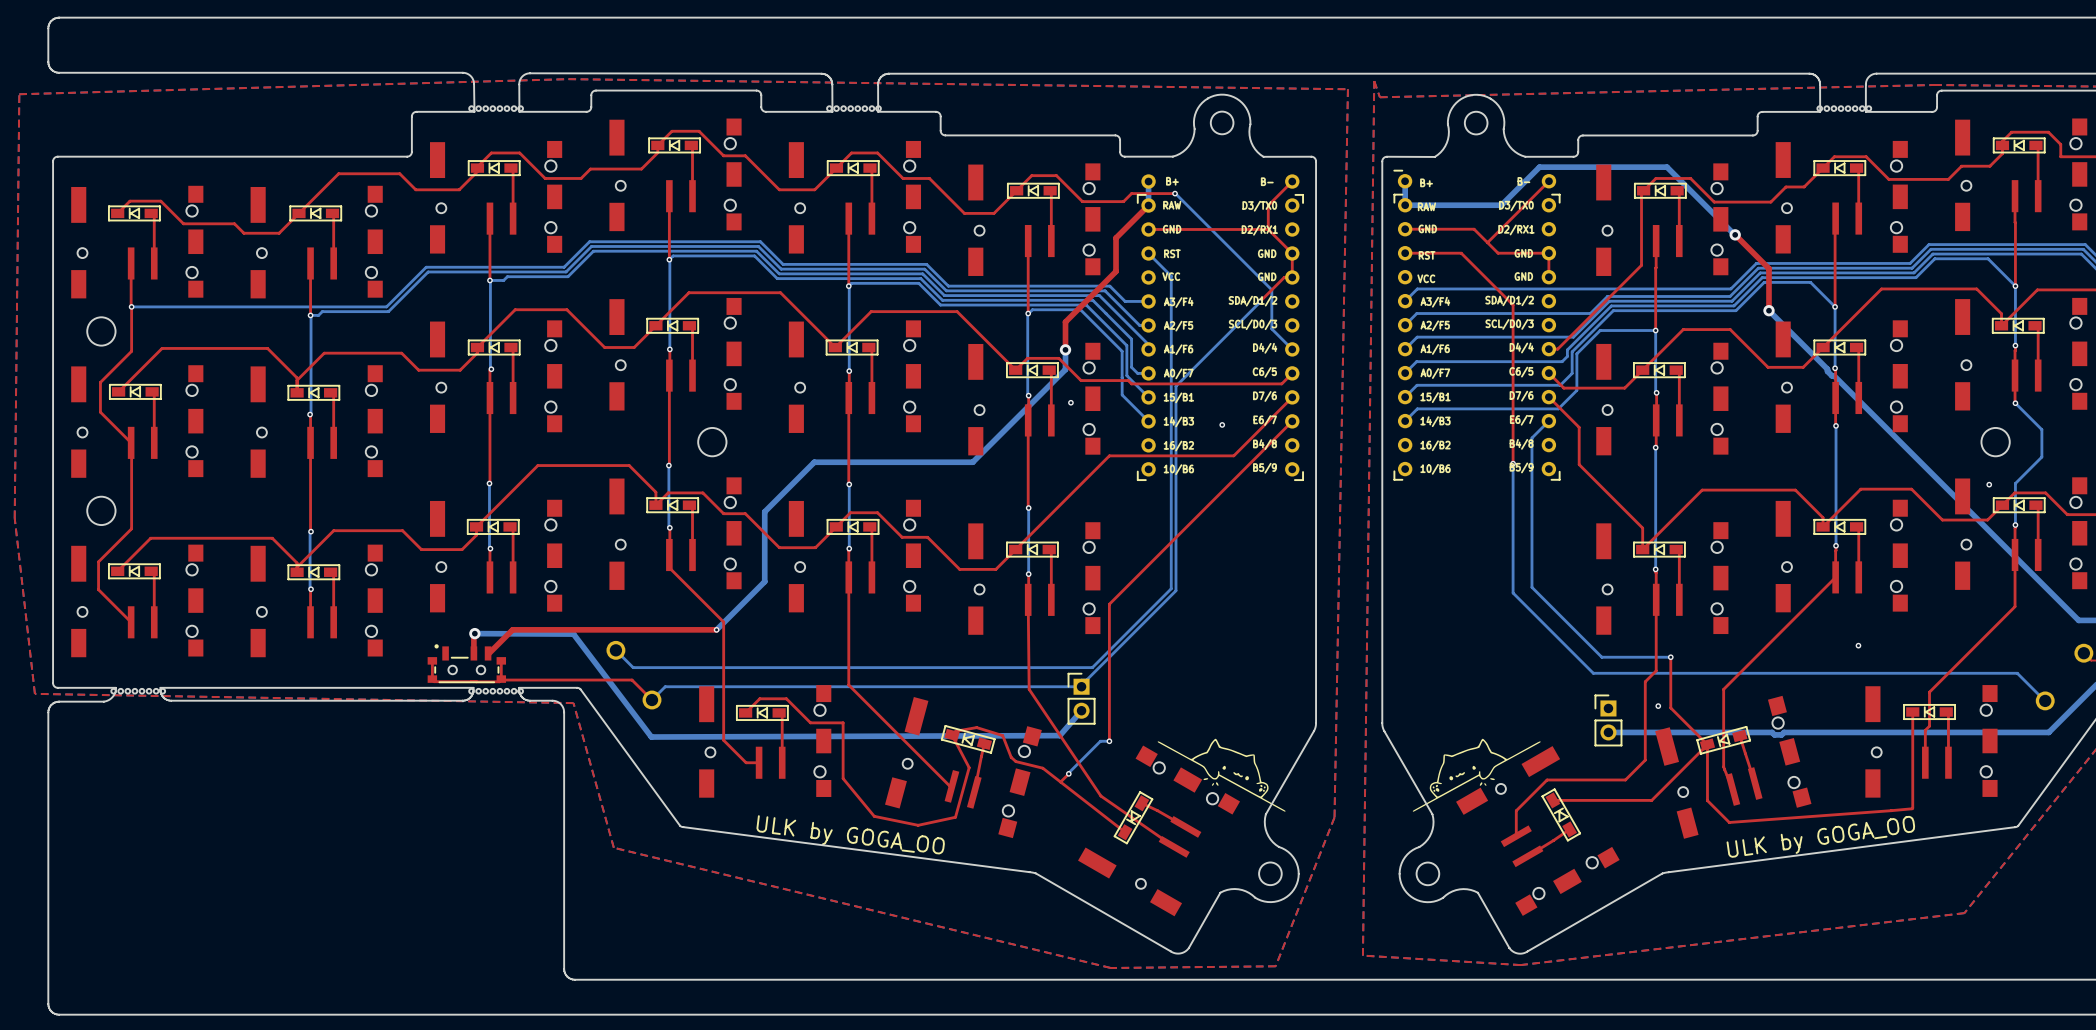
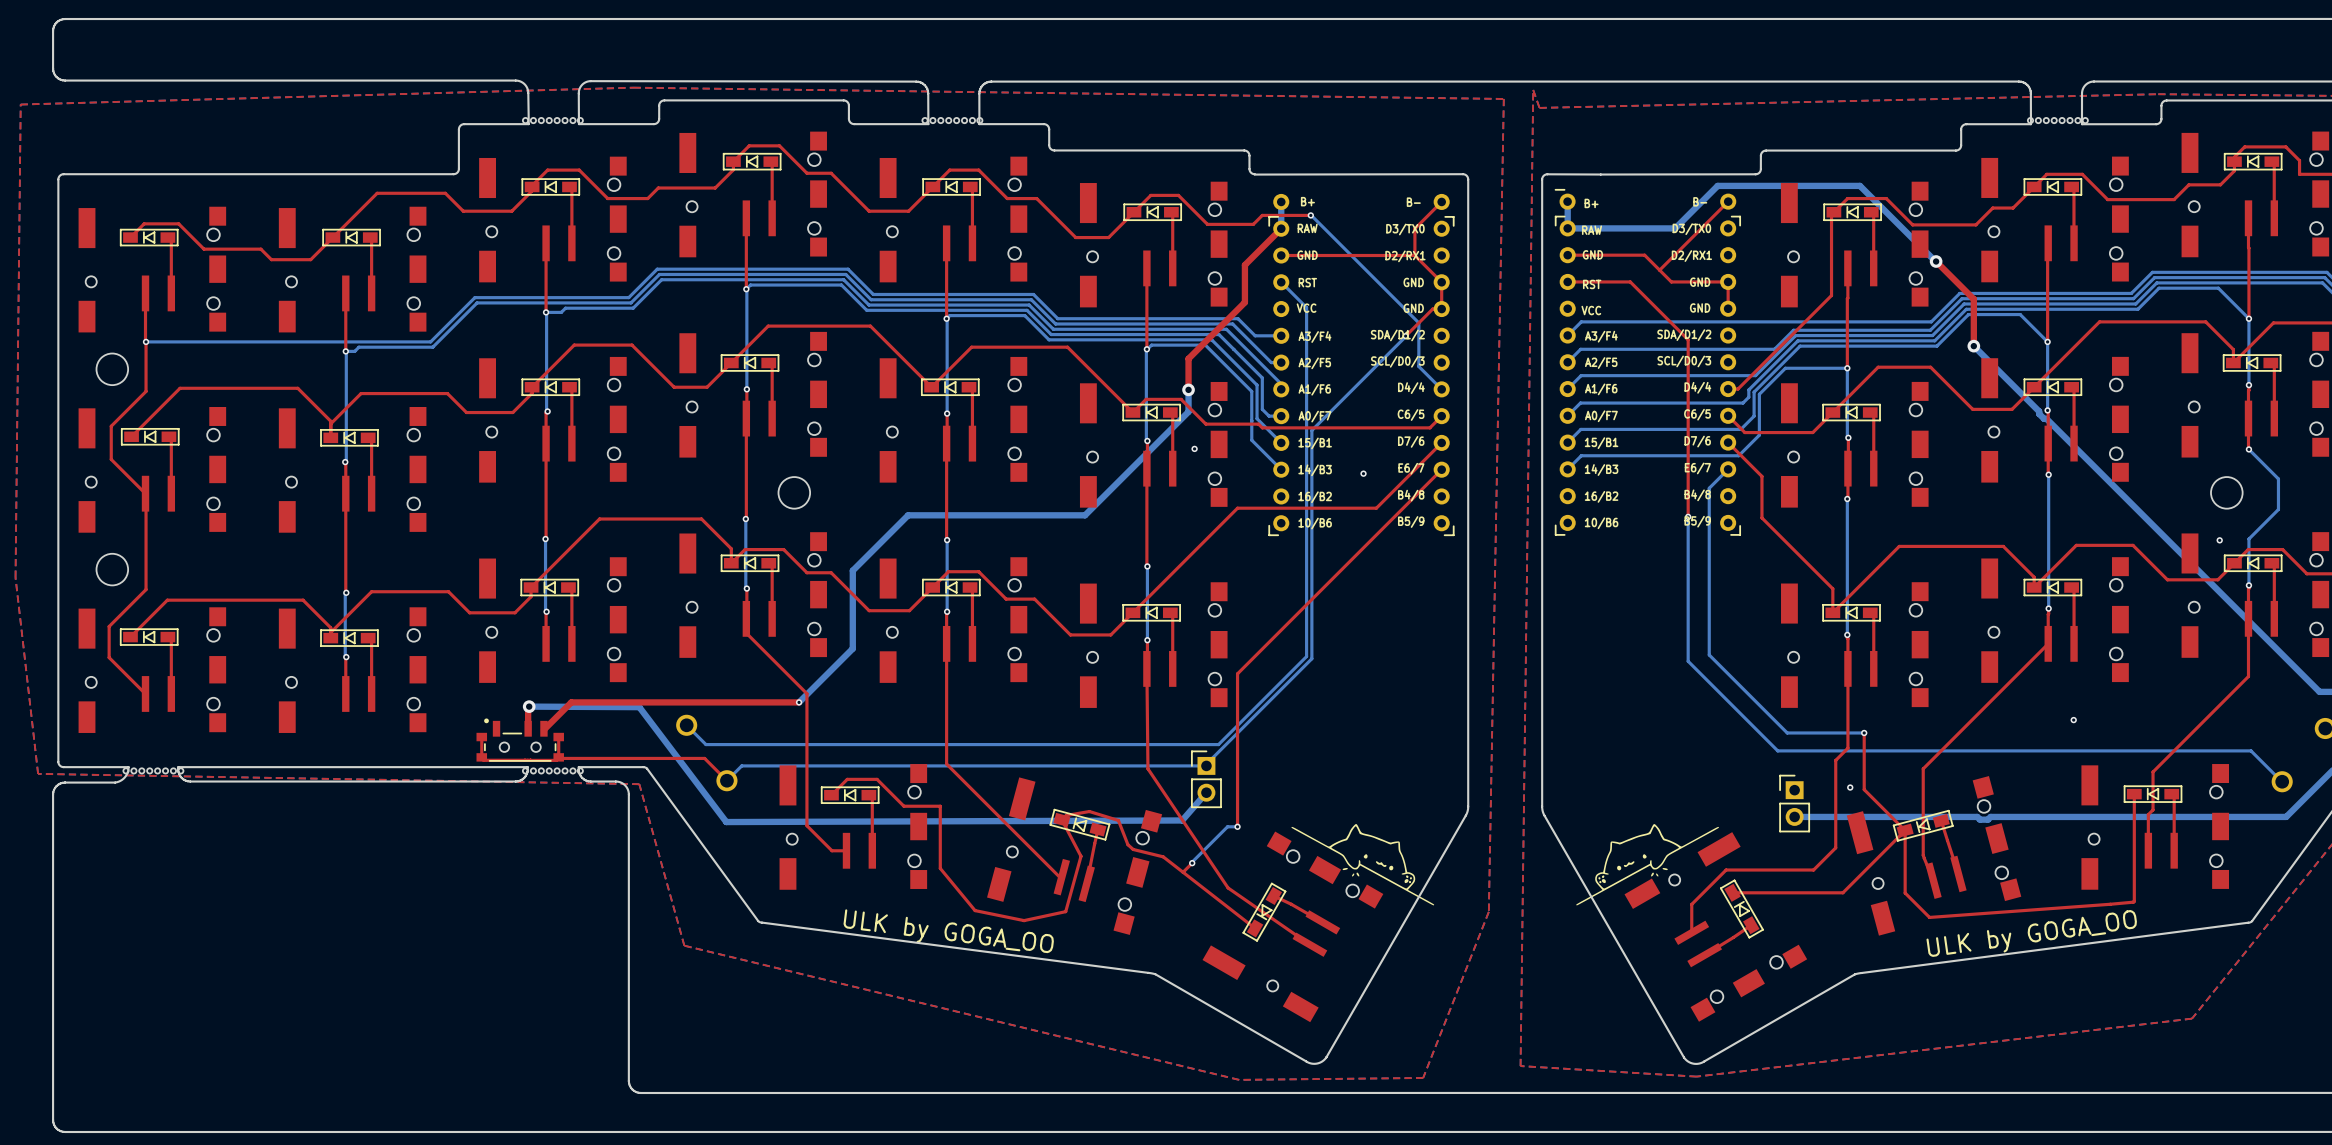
round board edge: [1209, 110, 1235, 136] -> none
round board edge: [1463, 110, 1489, 136] -> none
board edge: (1124, 156) (1172, 156) (1179, 153) (1192, 140) (1194, 118) (1199, 105) (1207, 98) (1220, 94) (1236, 98) (1246, 108) (1250, 120) (1250, 139) (1260, 154) (1263, 156) (1311, 156) -> (1254, 174) (1462, 174)
board edge: (1573, 156) (1525, 156) (1518, 153) (1506, 140) (1504, 118) (1498, 105) (1490, 98) (1477, 94) (1464, 97) (1452, 108) (1448, 117) (1446, 142) (1434, 156) -> (1755, 174) (1600, 174)
board edge: (1313, 731) (1265, 818) (1265, 829) (1270, 839) (1288, 851) (1296, 863) (1298, 873) (1295, 886) (1286, 896) (1271, 902) (1261, 900) (1238, 889) (1220, 892) (1189, 947) -> (1465, 815) (1326, 1057)
board edge: (1384, 731) (1433, 818) (1432, 829) (1427, 839) (1410, 852) (1401, 863) (1399, 873) (1402, 886) (1414, 898) (1427, 902) (1437, 900) (1459, 889) (1477, 892) (1509, 947) -> (1544, 815) (1683, 1057)
round board edge: [1258, 861, 1283, 887] -> none
round board edge: [1415, 861, 1441, 887] -> none

